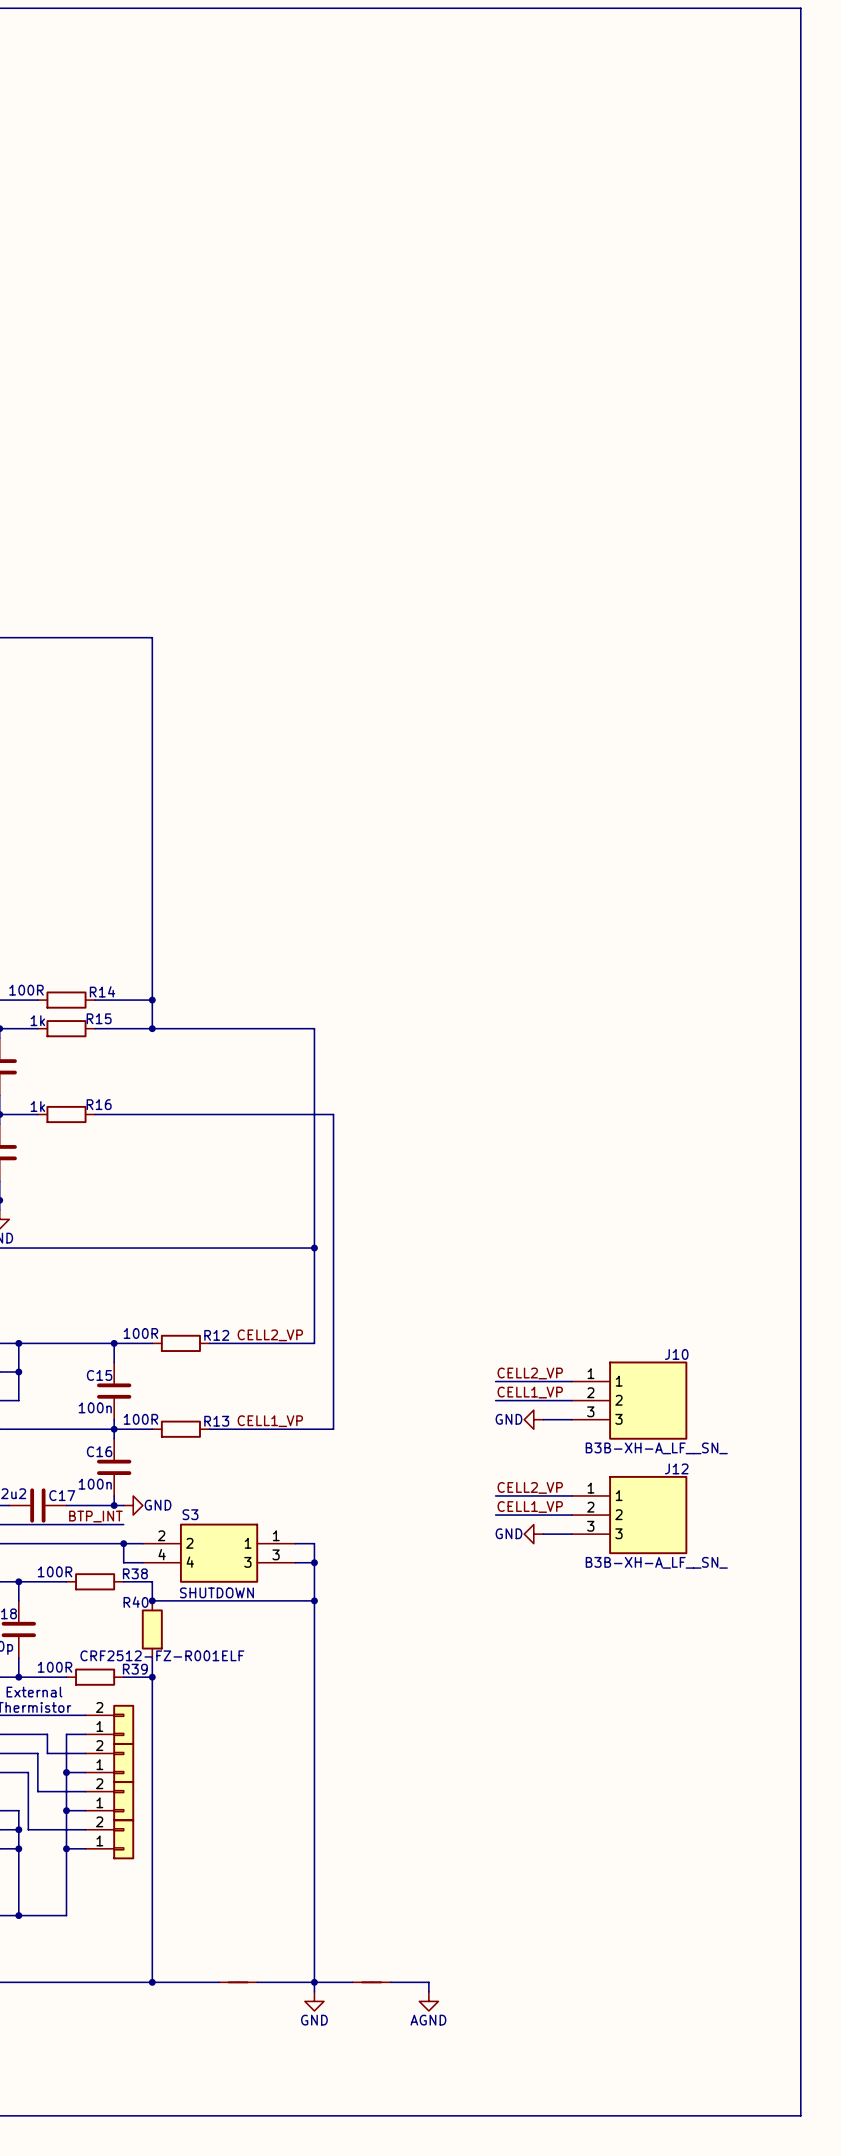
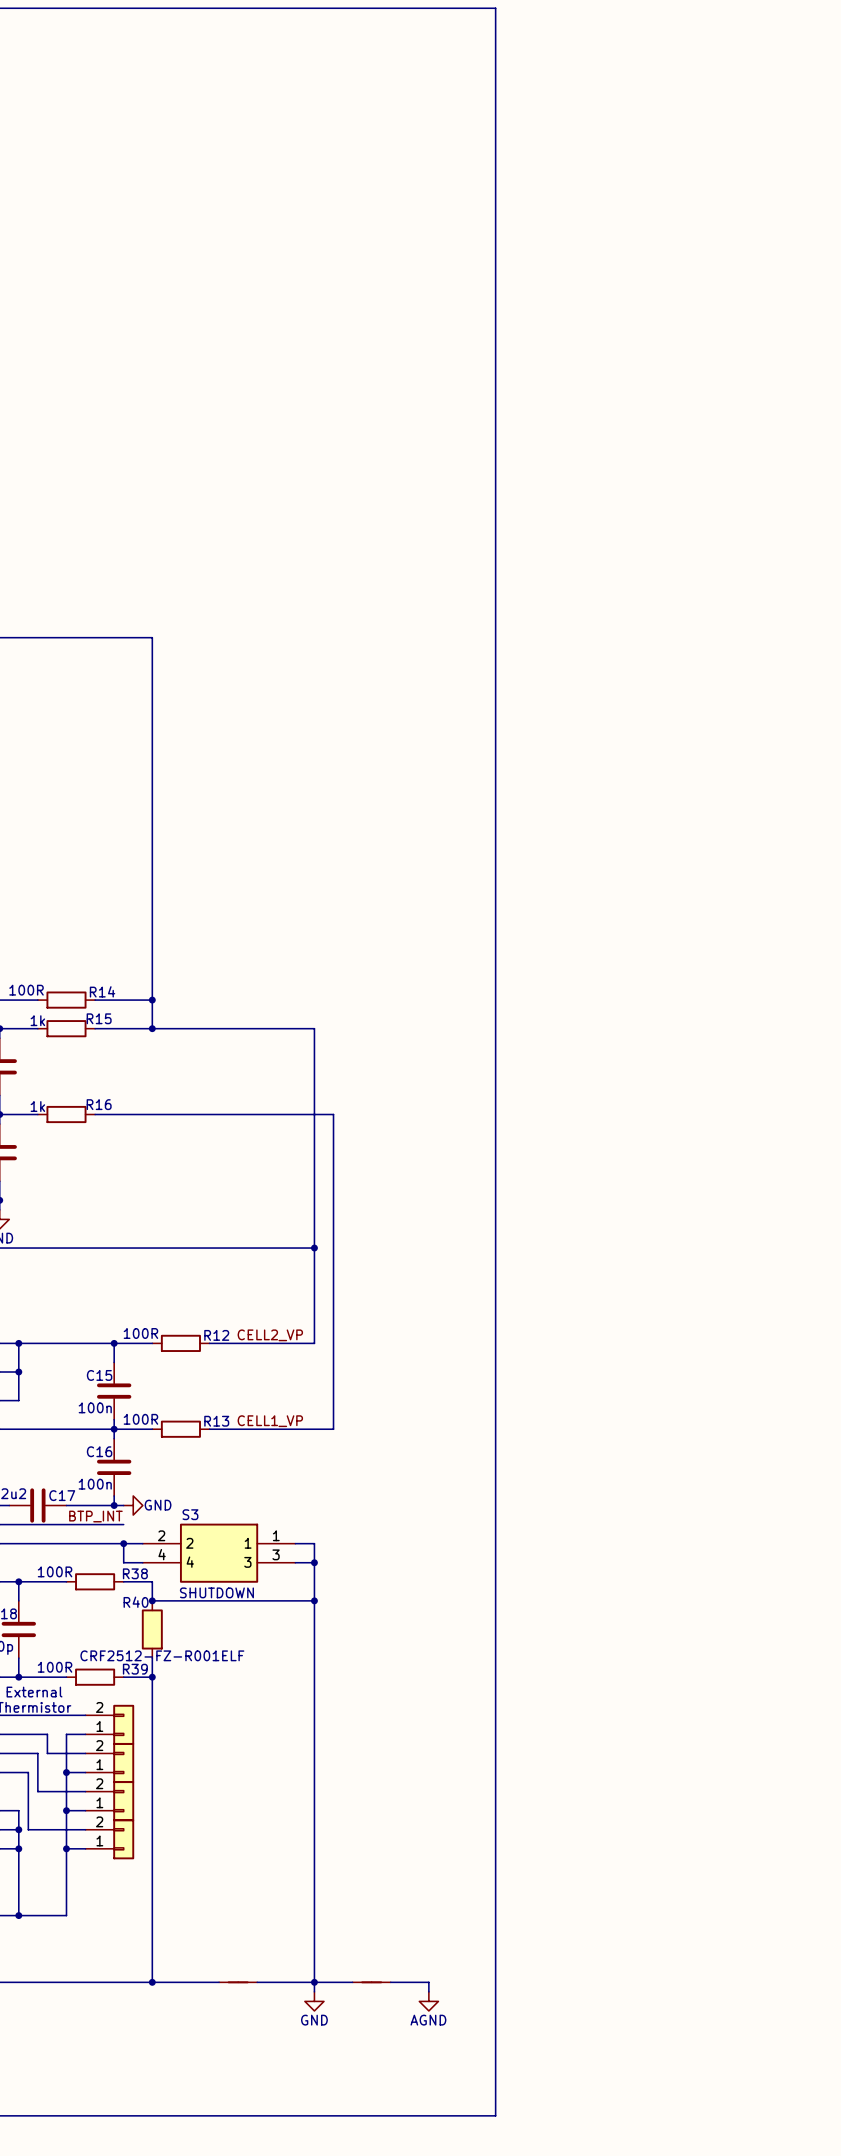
line: (495, 8) (800, 8) (800, 2115) (495, 2115) -> (495, 8) (495, 2115)
label: CELL2_VP (530, 1373) -> none
wire: (495, 1381) (571, 1381) -> none
label: CELL1_VP (530, 1392) -> none
wire: (495, 1400) (571, 1400) -> none
J10: B3B-XH-A_LF__SN_ (629, 1400) -> none
power symbol: GND (533, 1419) -> none
wire: (543, 1419) (571, 1419) -> none
label: CELL2_VP (530, 1487) -> none
wire: (495, 1495) (571, 1495) -> none
label: CELL1_VP (530, 1506) -> none
wire: (495, 1515) (571, 1515) -> none
J12: B3B-XH-A_LF__SN_ (629, 1515) -> none
power symbol: GND (533, 1534) -> none
wire: (543, 1534) (571, 1534) -> none

